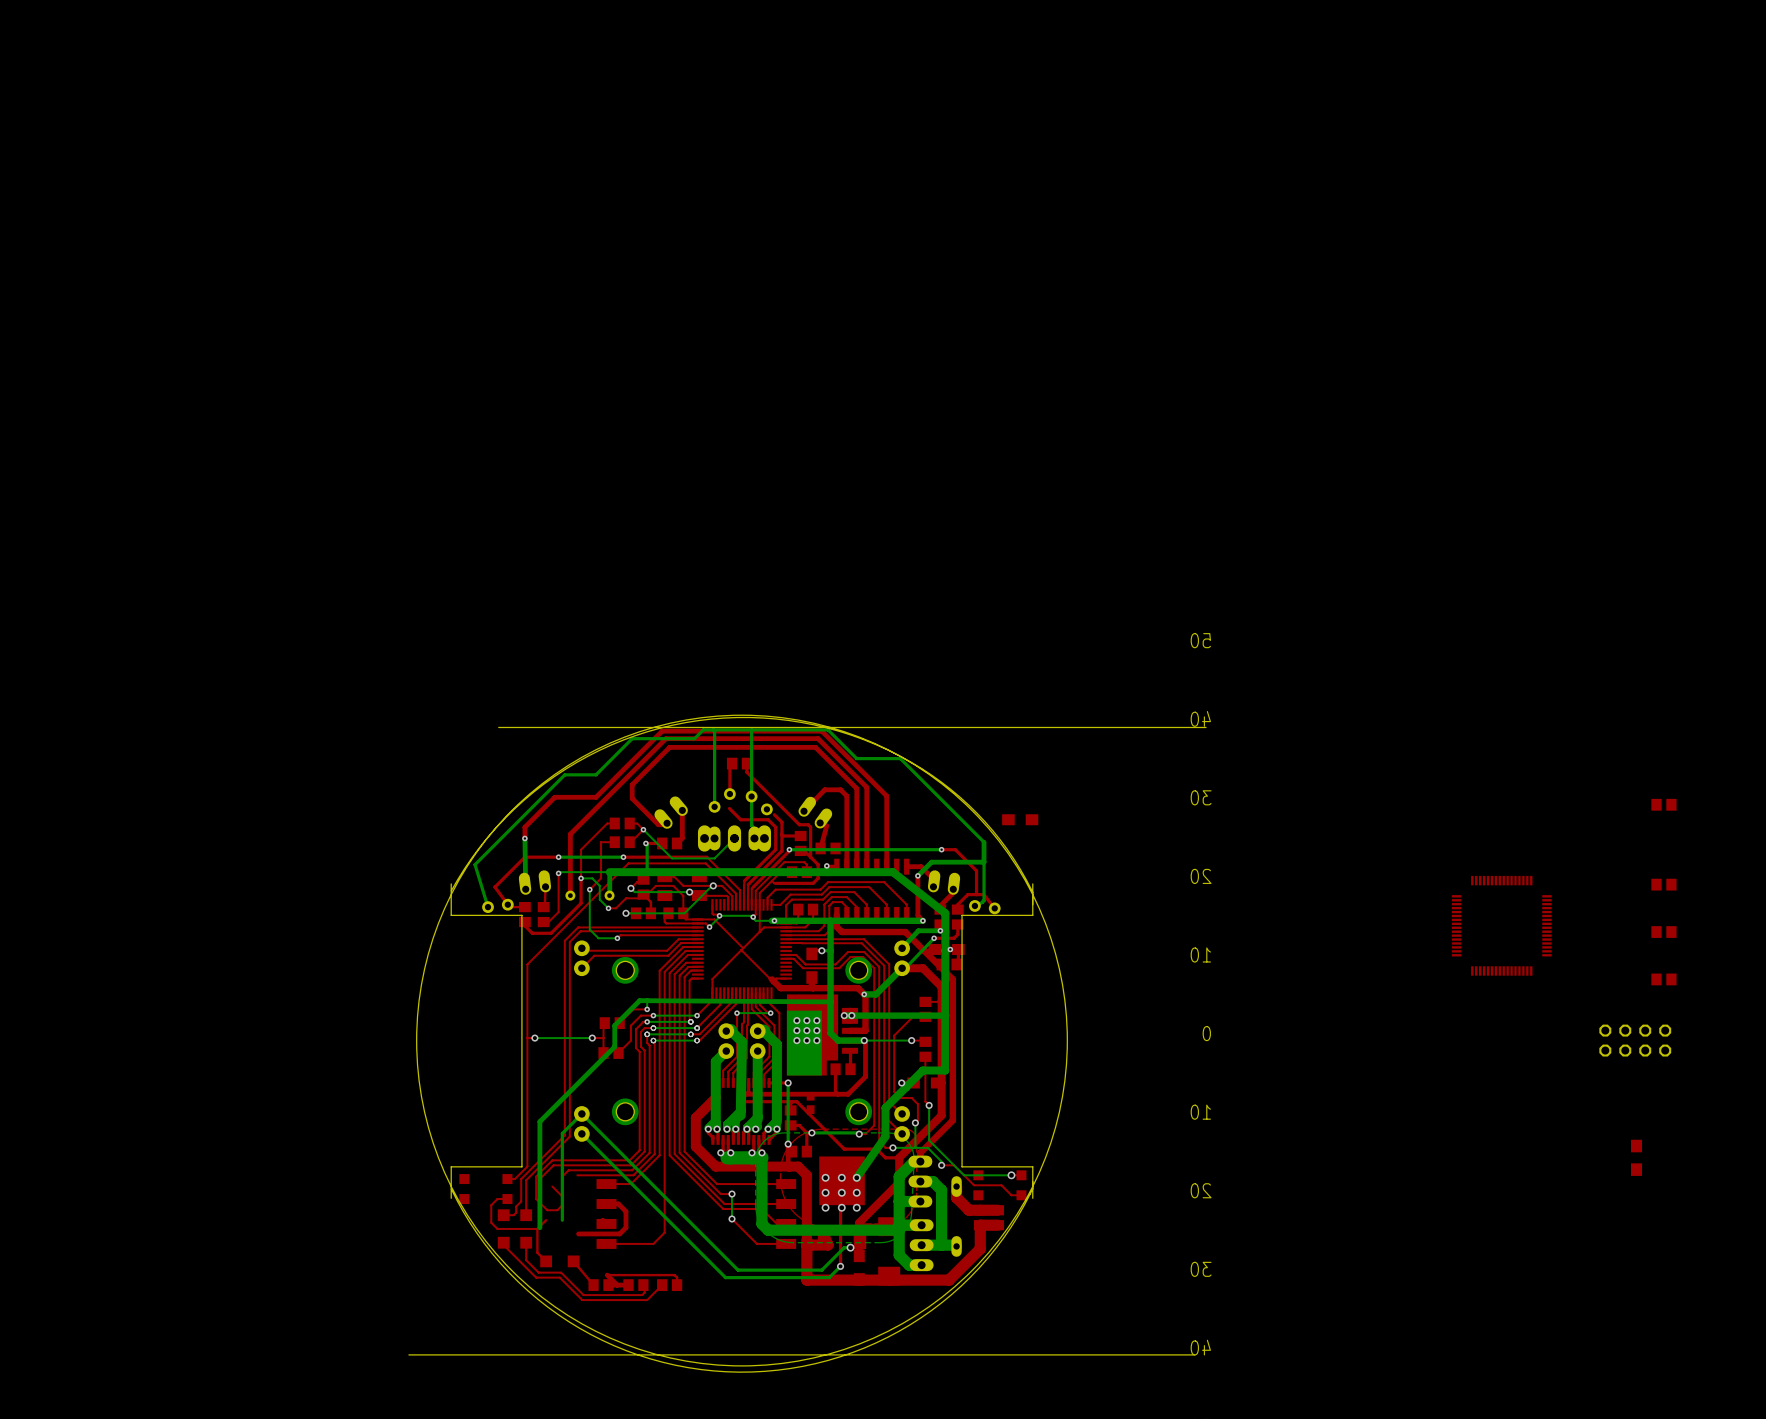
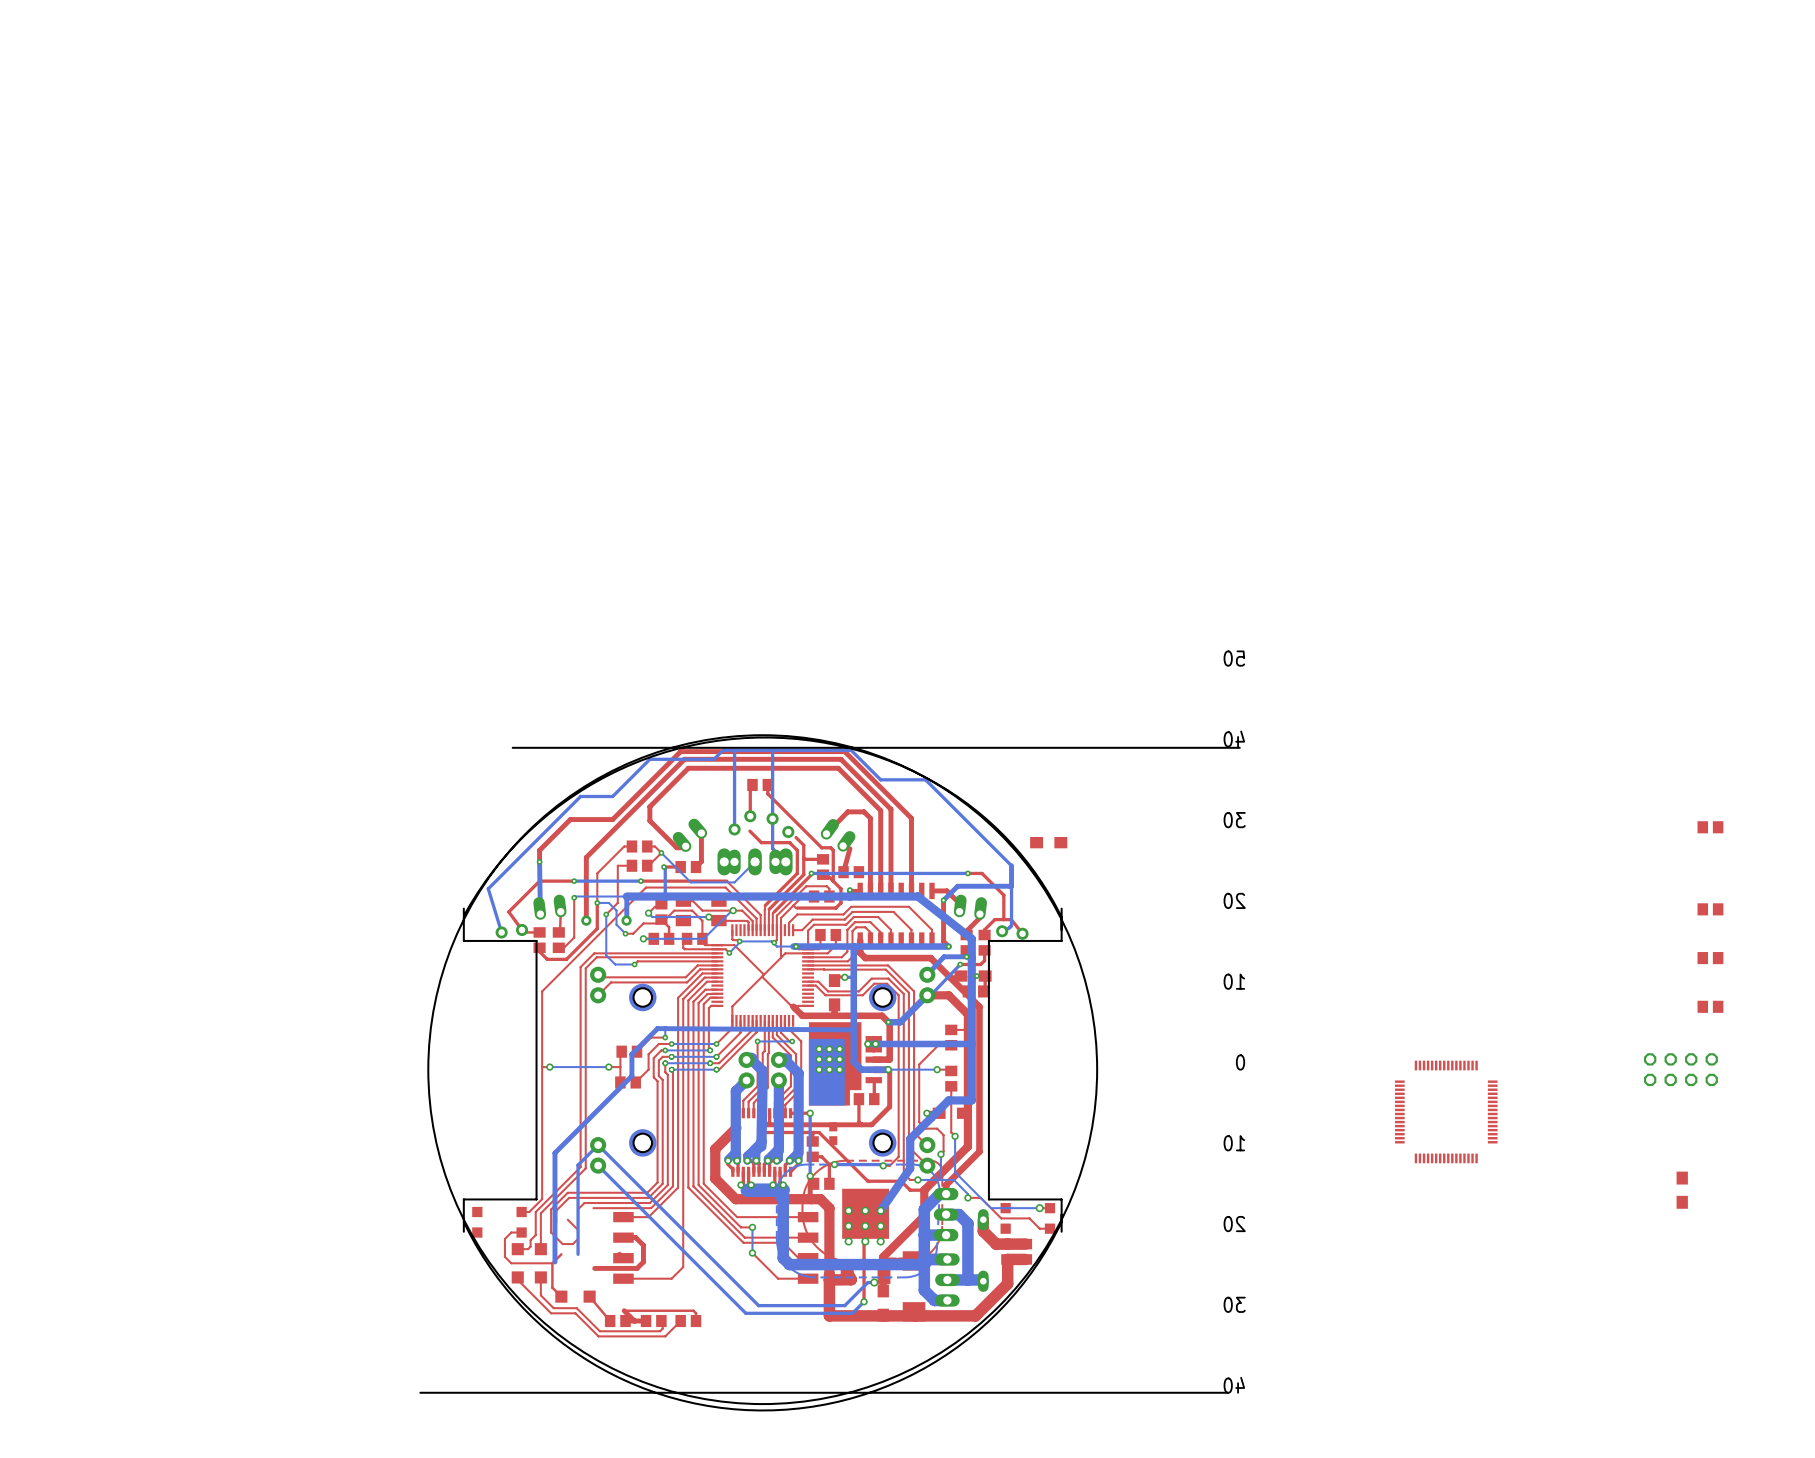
part position: (1501, 925) -> (1446, 1111)

